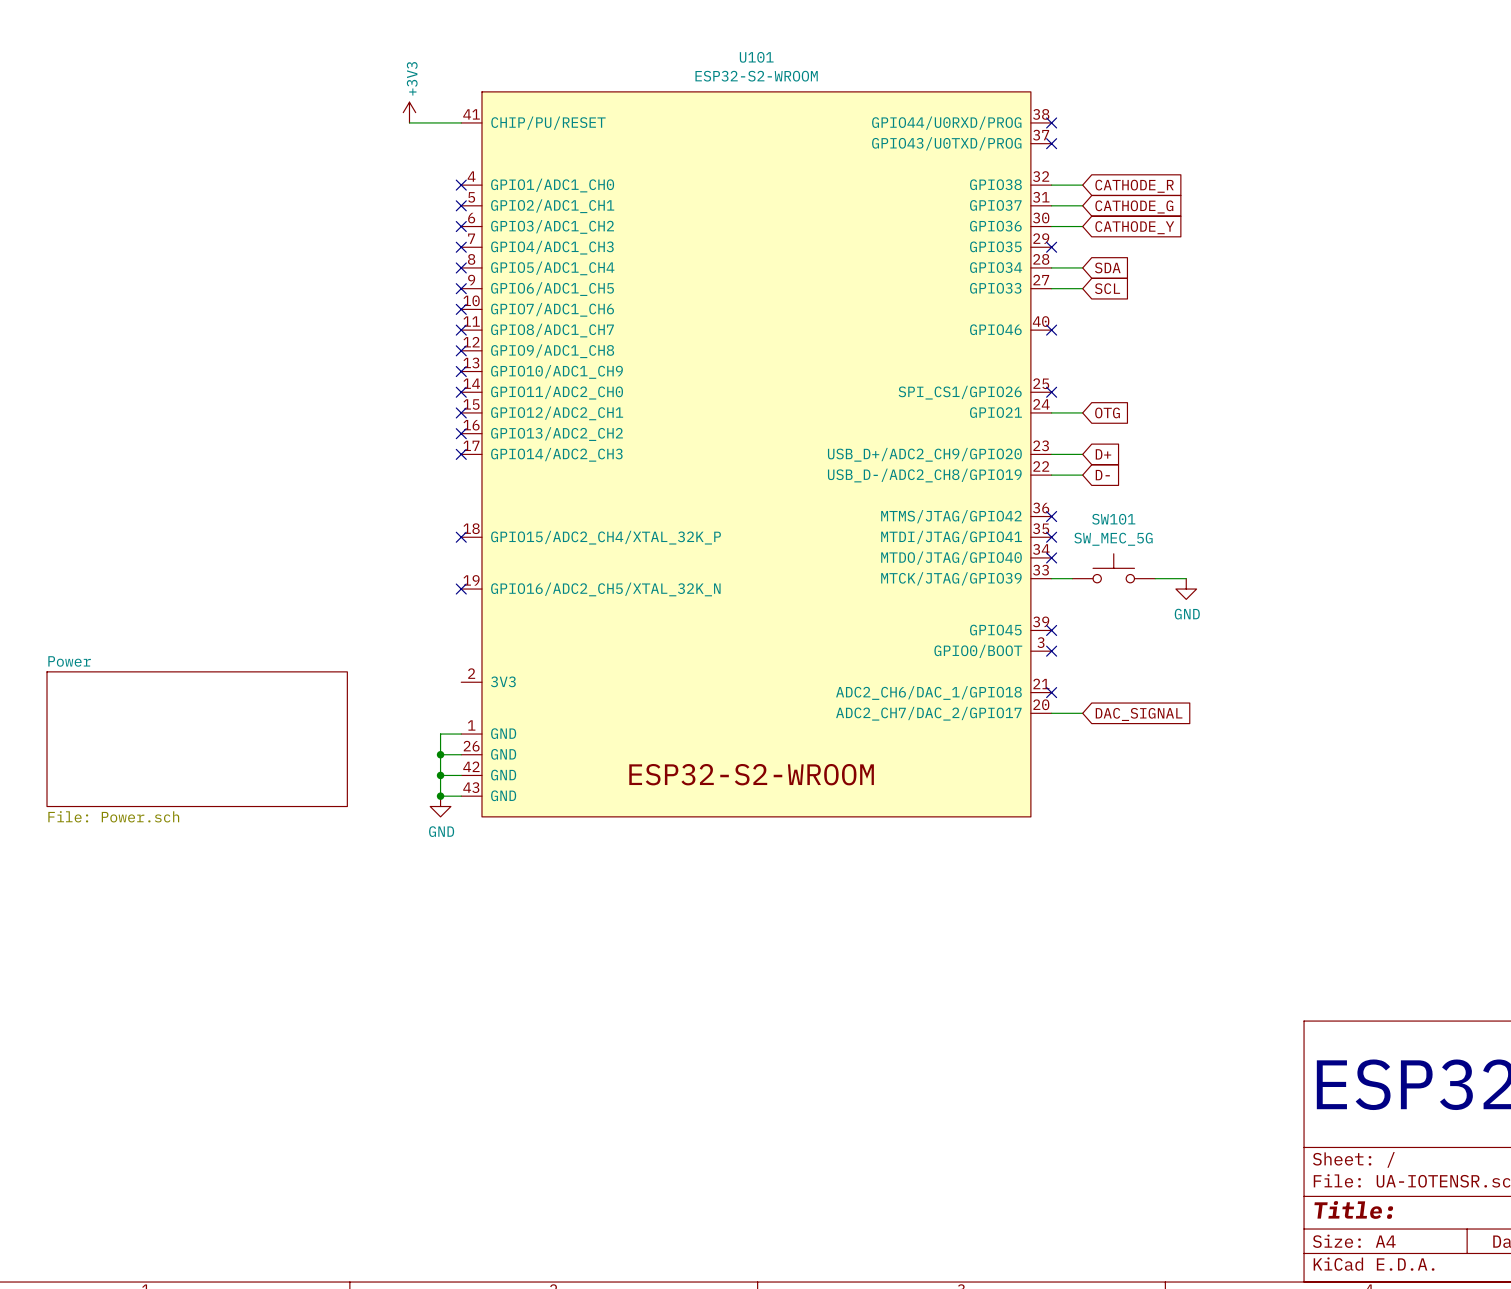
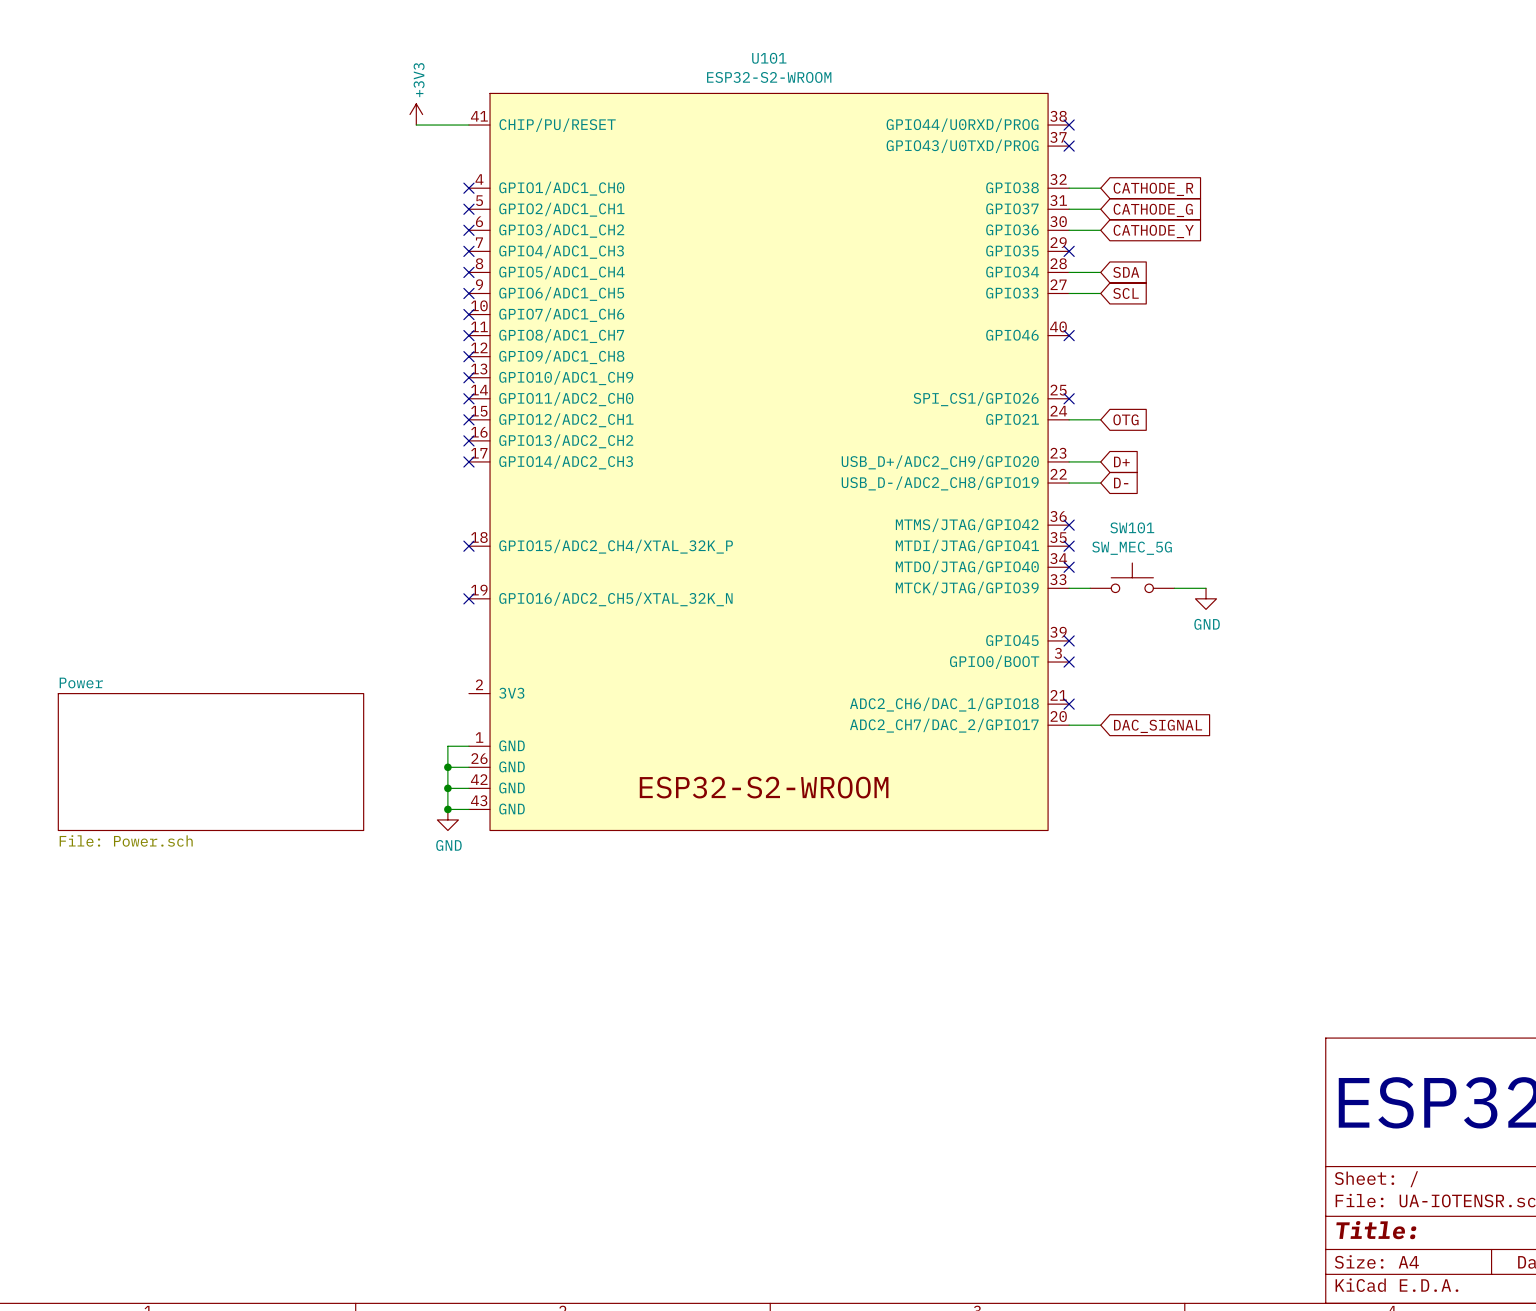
sheet Power position: (197, 739) -> (210, 762)

